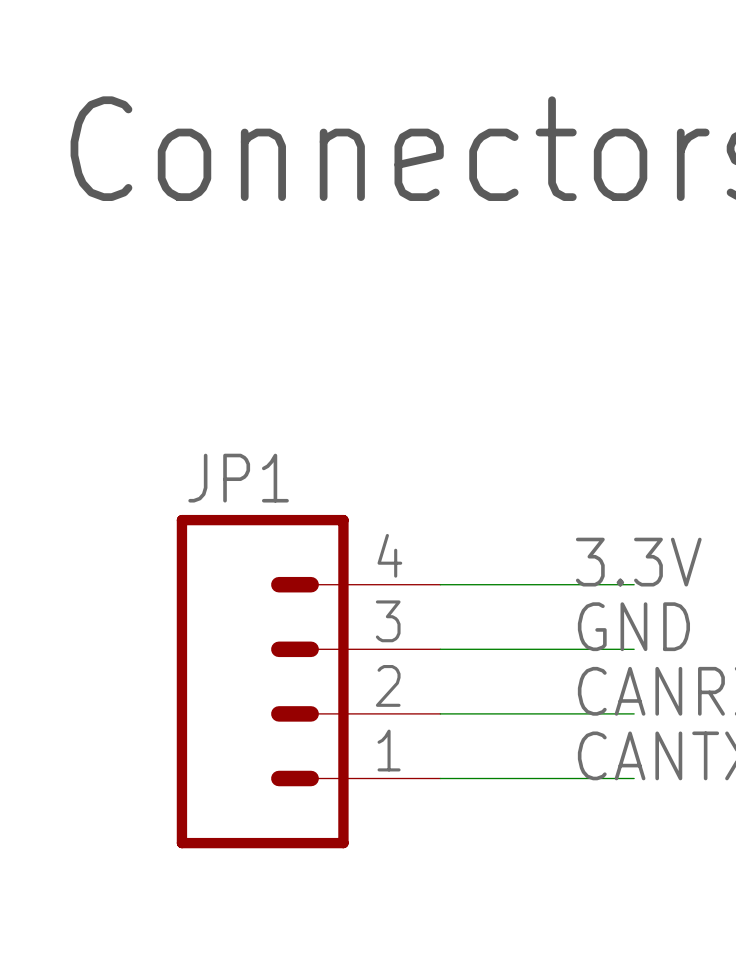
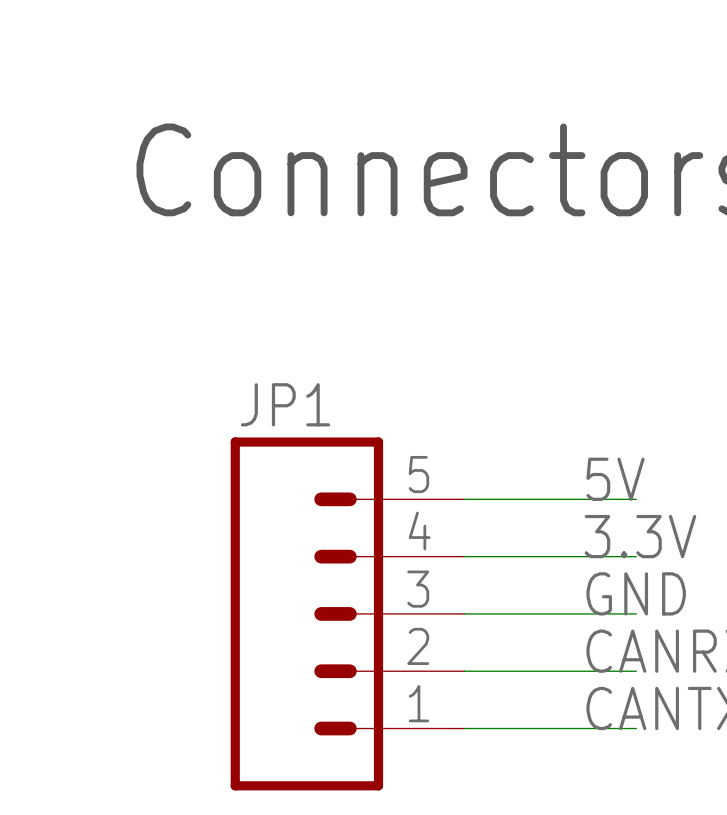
label: none -> 5V (615, 479)
JP1 symbol: [176, 514, 441, 849] -> [230, 437, 465, 791]
wire: none -> (464, 499) (636, 499)

